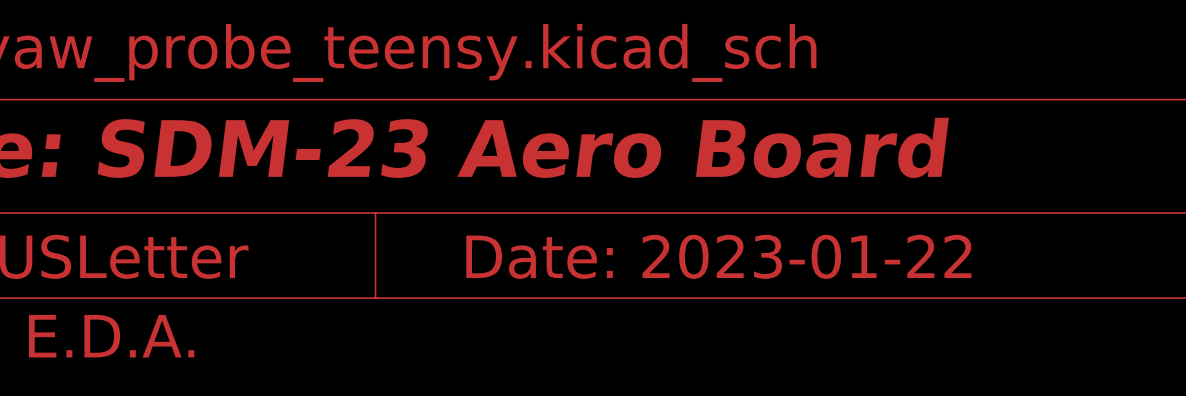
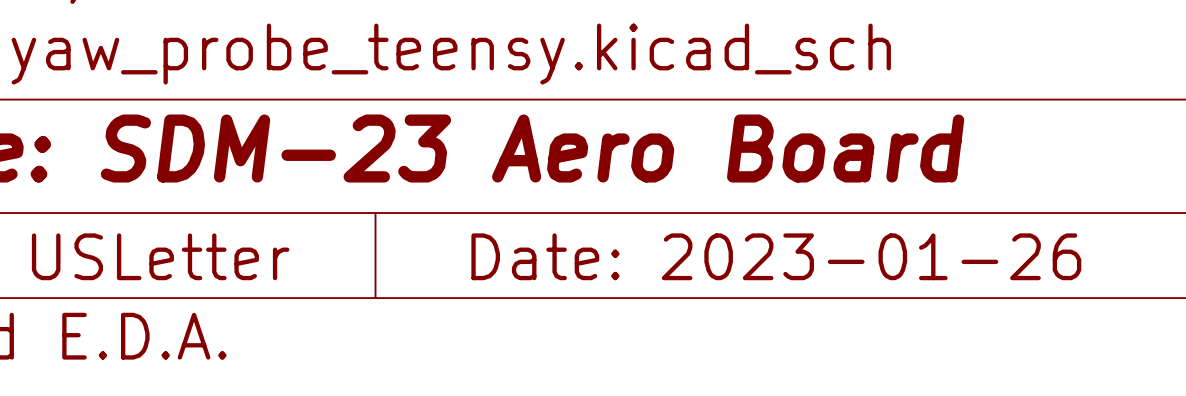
title block: Date: 2023-01-22 (718, 256) -> Date: 2023-01-26 (776, 256)

